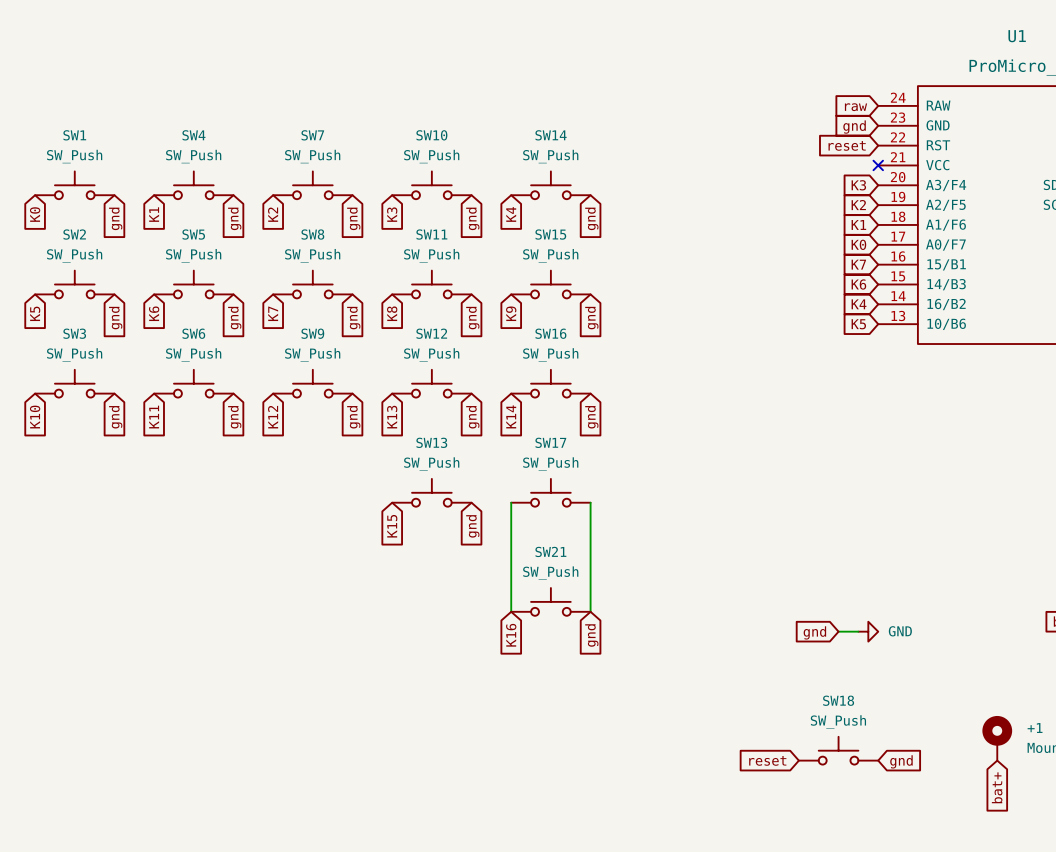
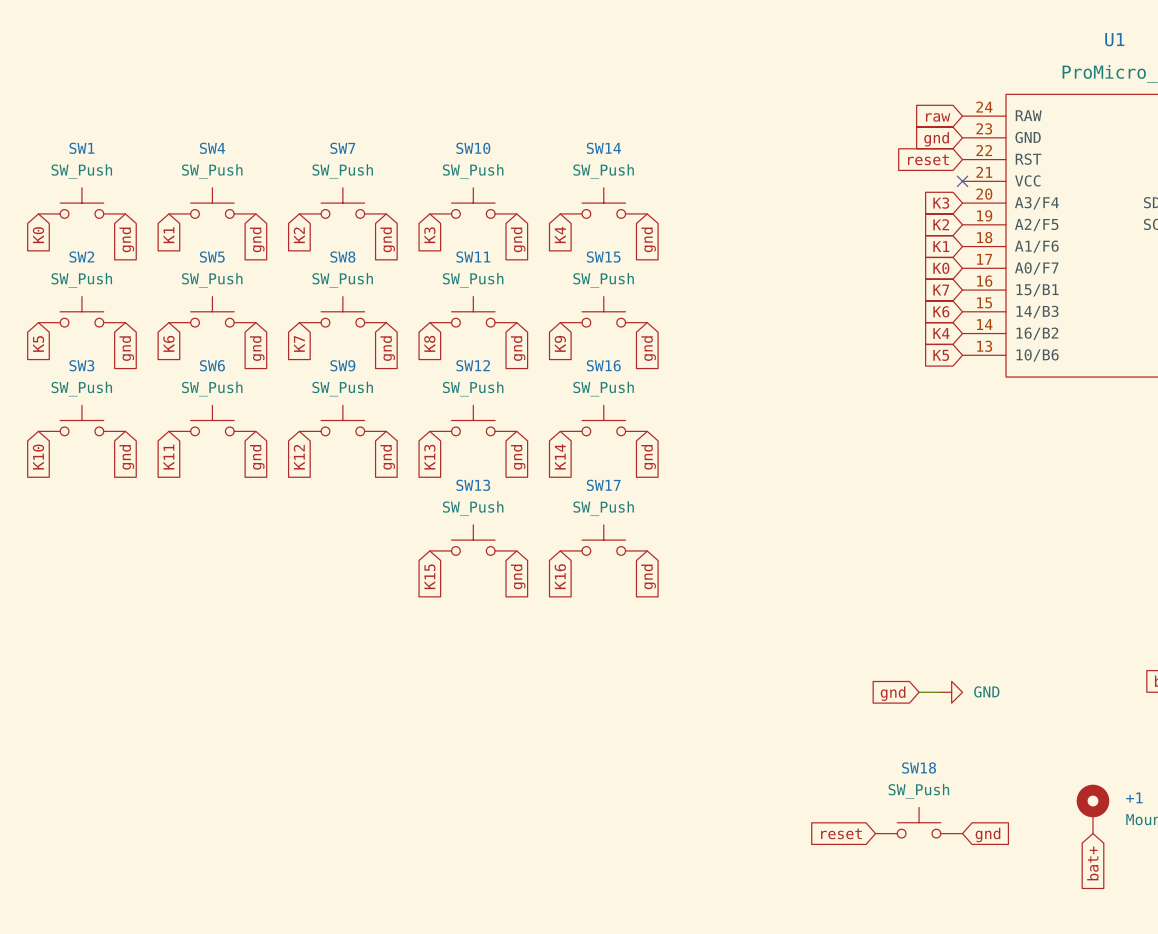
wire: (511, 502) (511, 611) -> none
wire: (590, 502) (590, 611) -> none
SW21: SW_Push (550, 601) -> none
global label position: K16 (511, 635) -> K16 (560, 576)
global label position: gnd (591, 635) -> gnd (648, 576)

